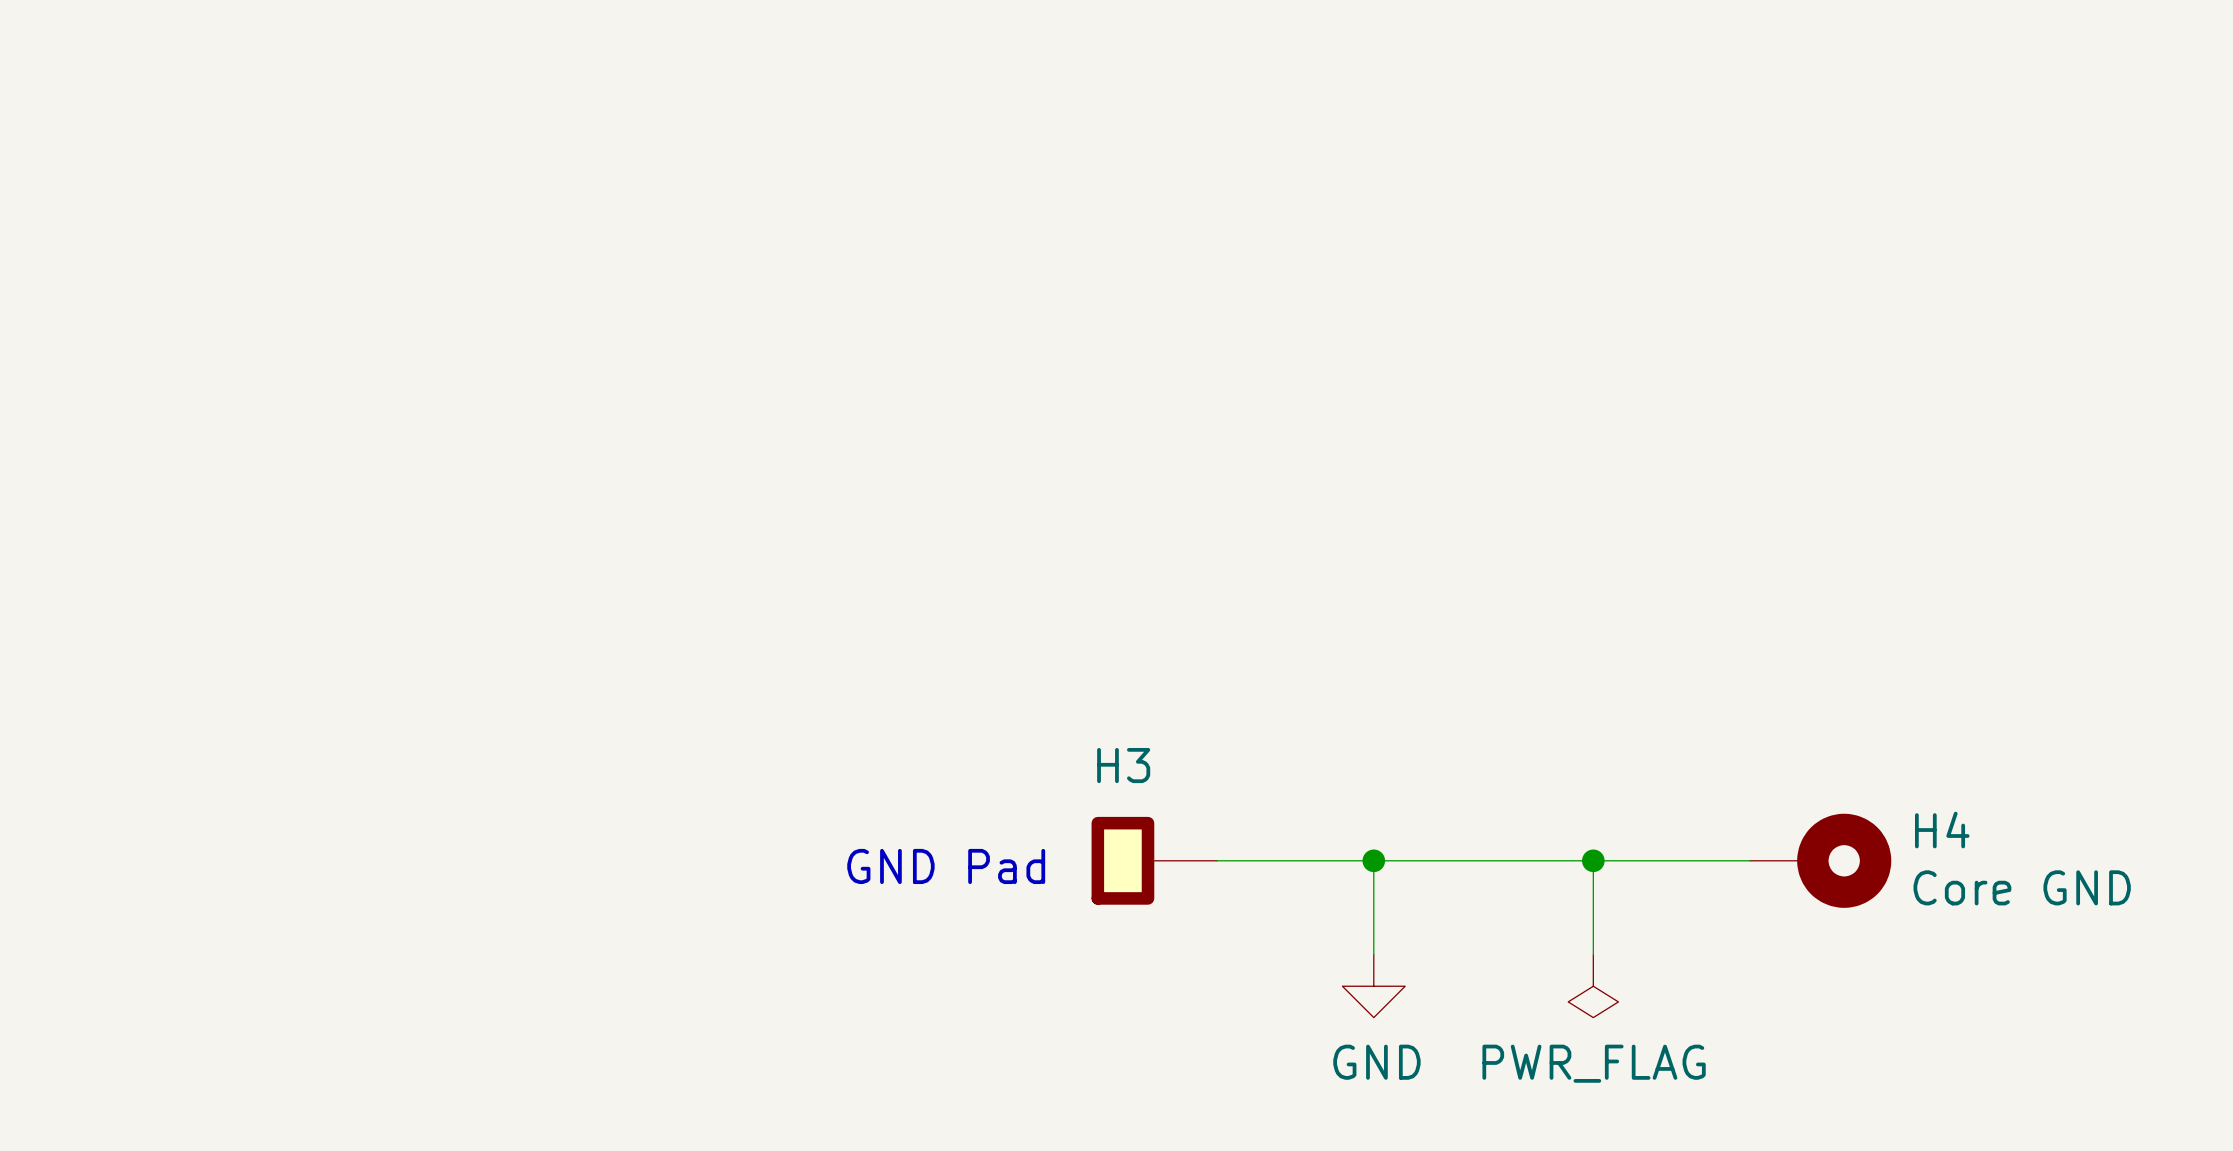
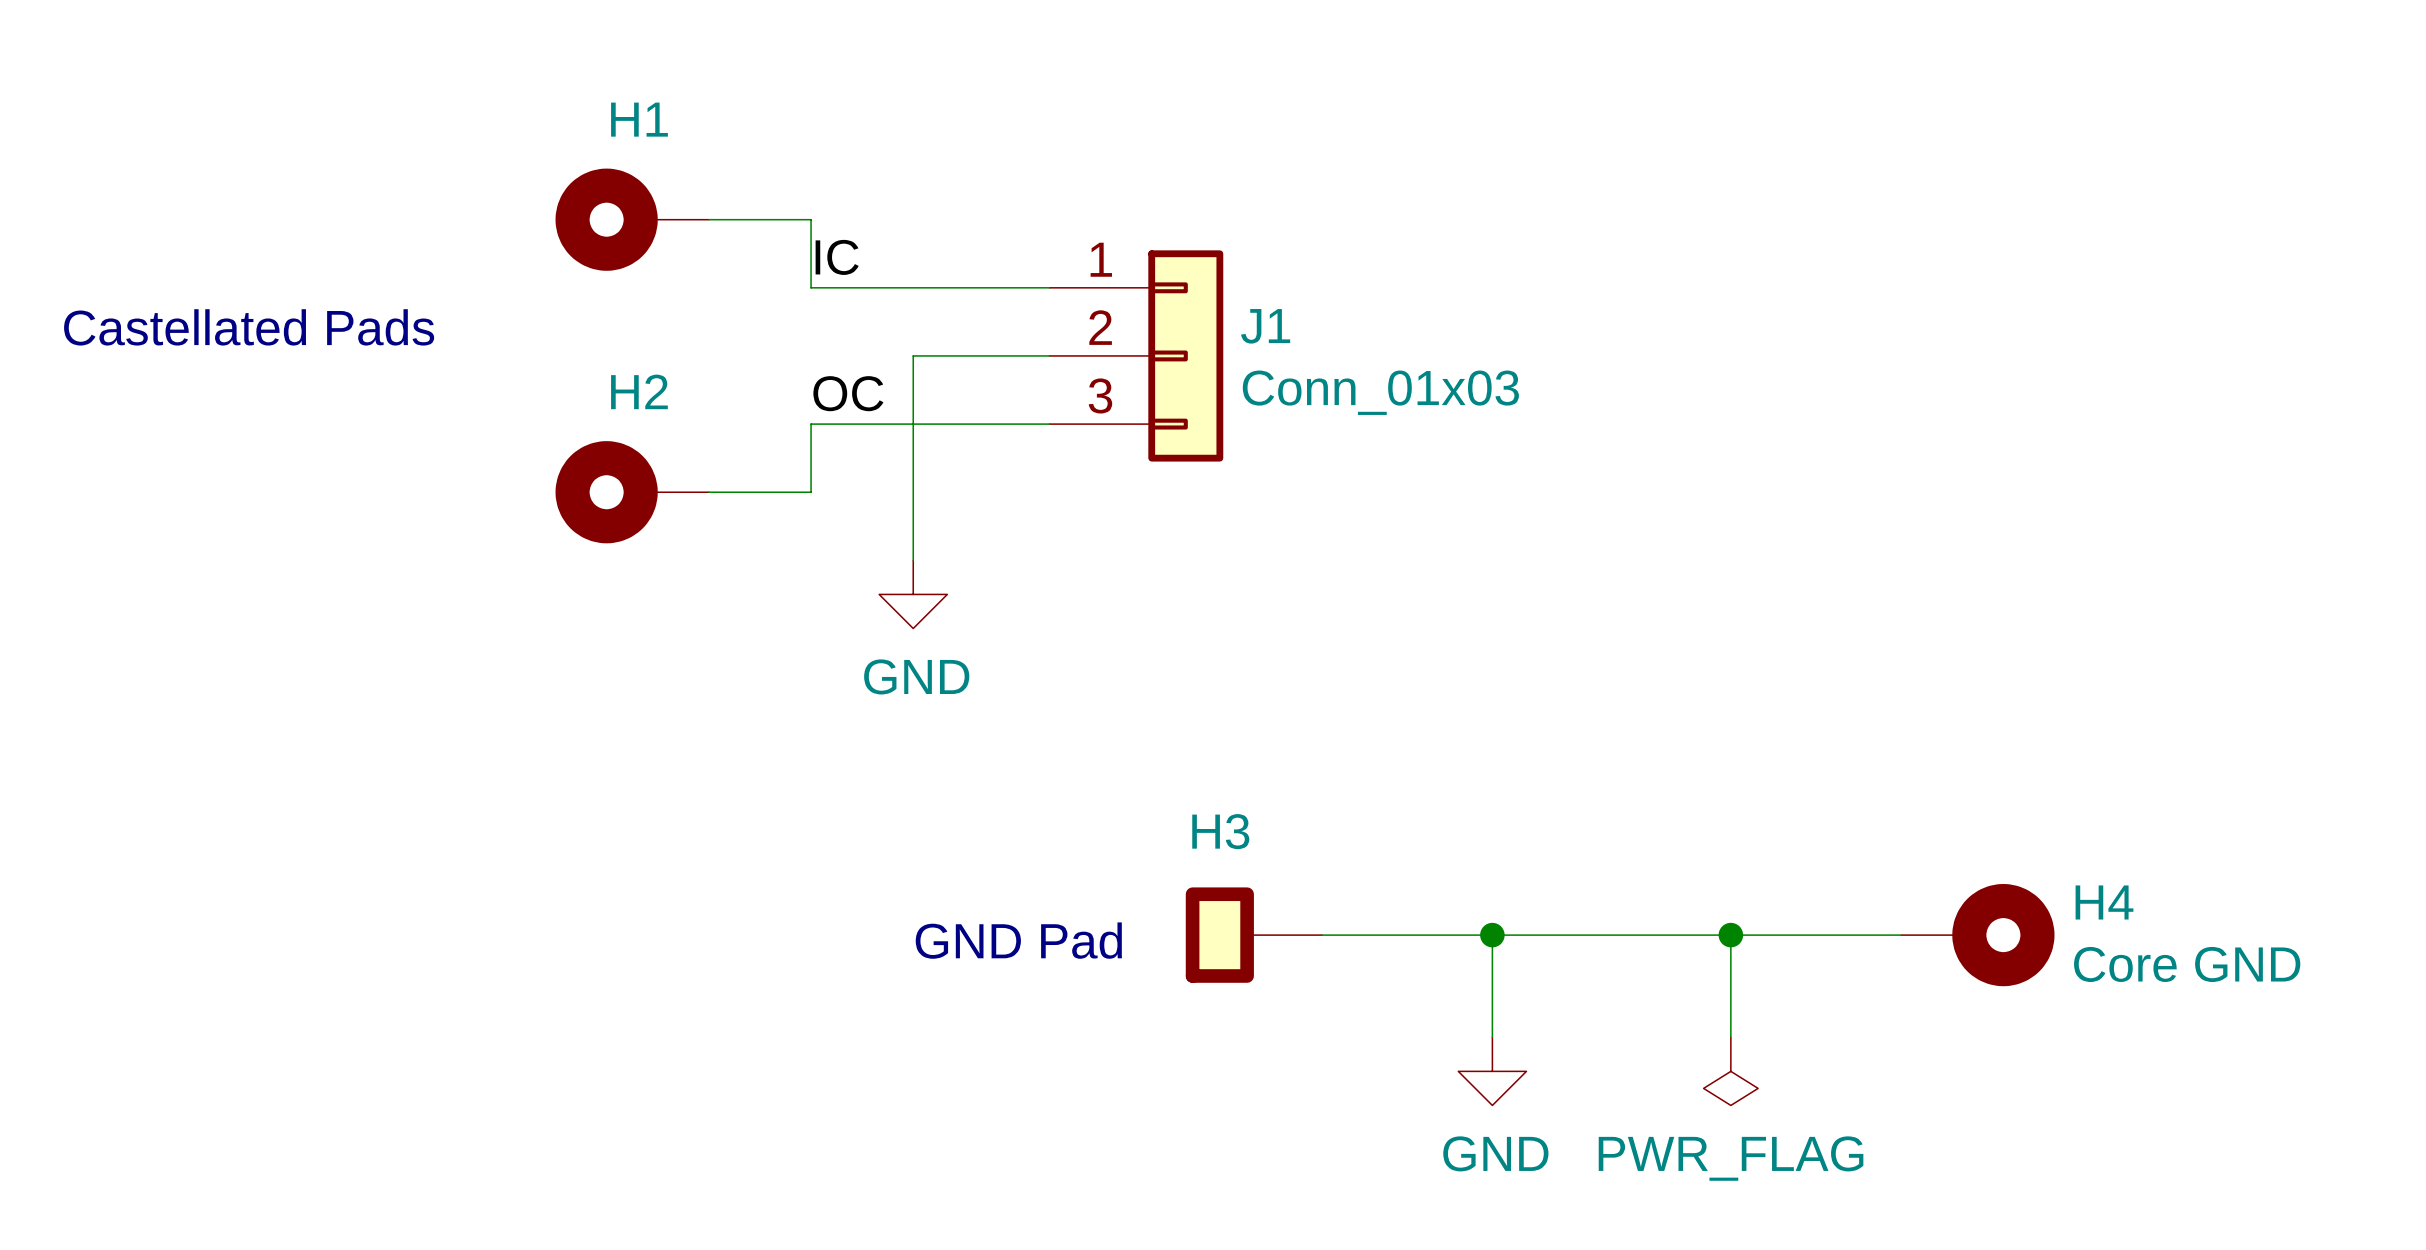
H1: none -> (632, 219)
wire: none -> (708, 219) (811, 219) (811, 287) (1049, 287)
label: none -> IC (837, 257)
text: none -> Castellated Pads (249, 327)
wire: none -> (1049, 355) (913, 355) (913, 560)
J1: none -> Conn_01x03 (1136, 355)
label: none -> OC (848, 393)
wire: none -> (1049, 424) (811, 424) (811, 492) (708, 492)
H2: none -> (632, 492)
power symbol: none -> GND (913, 594)

